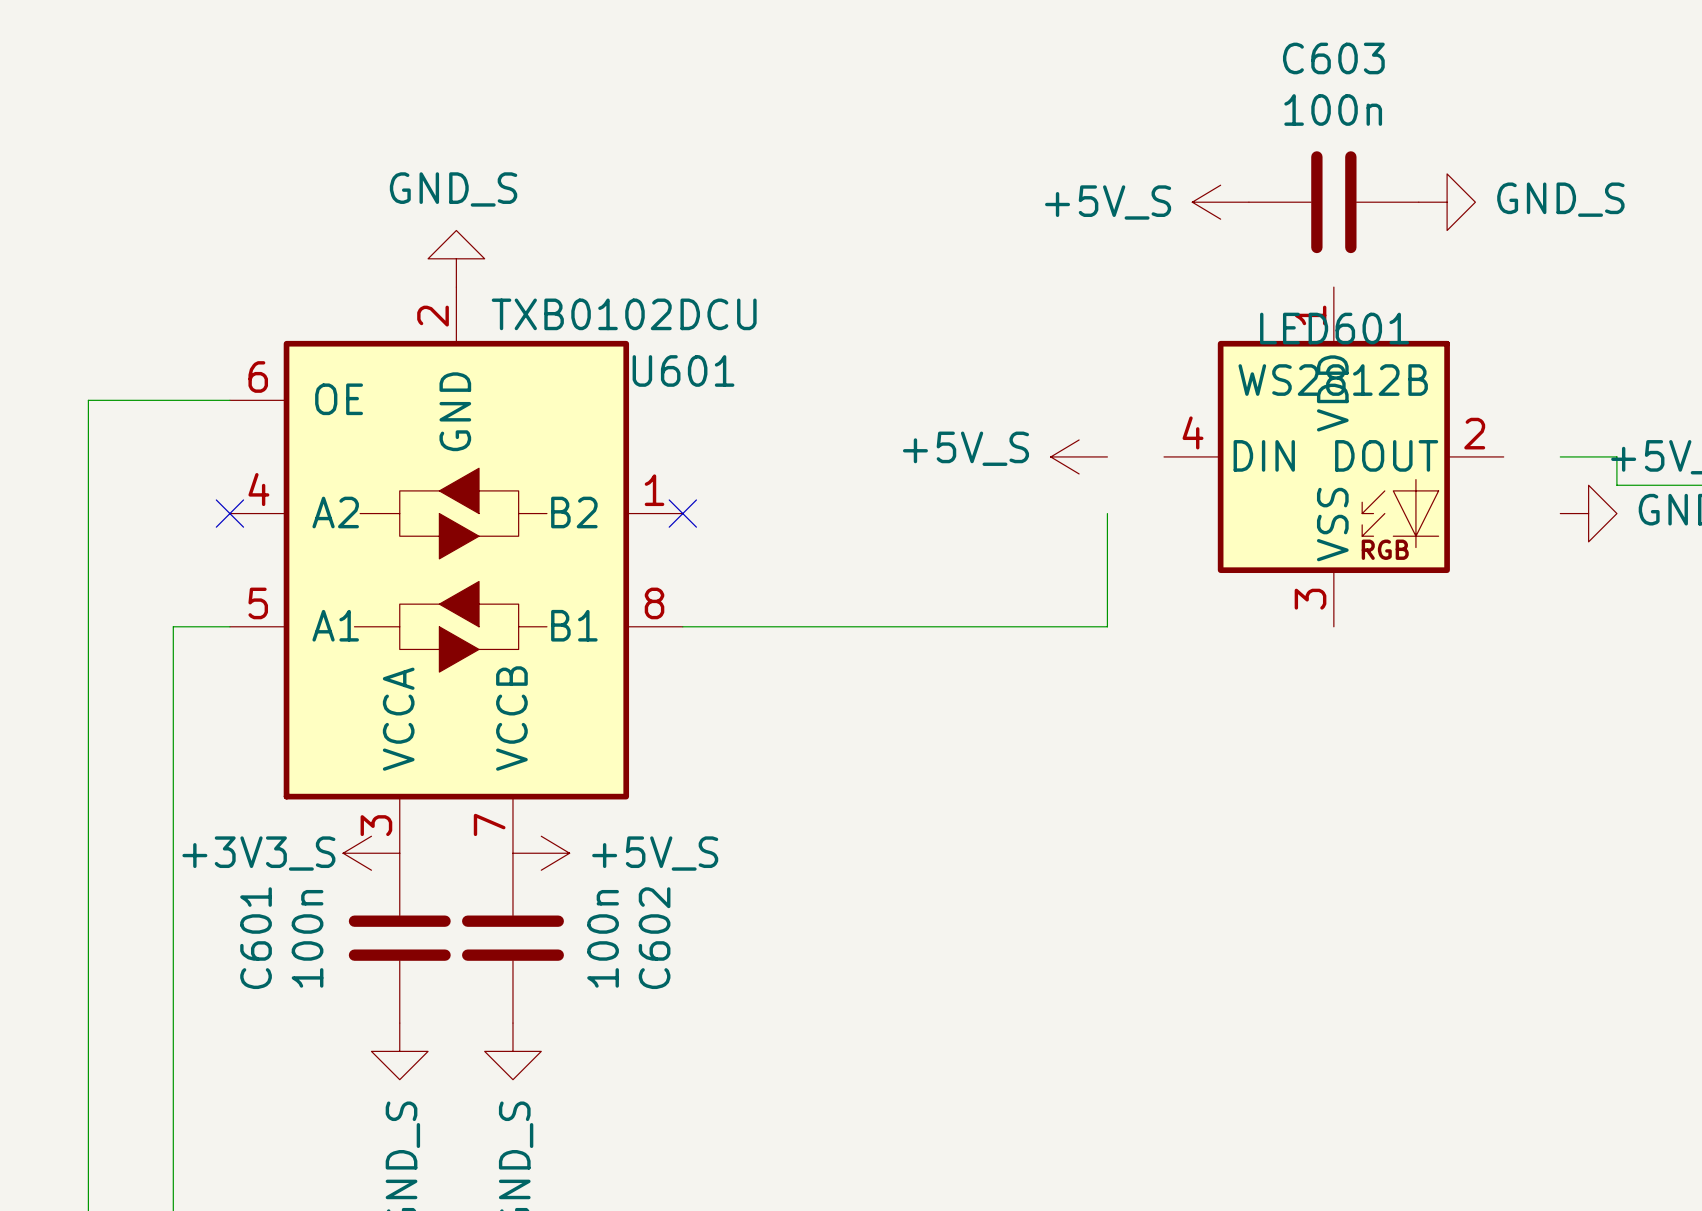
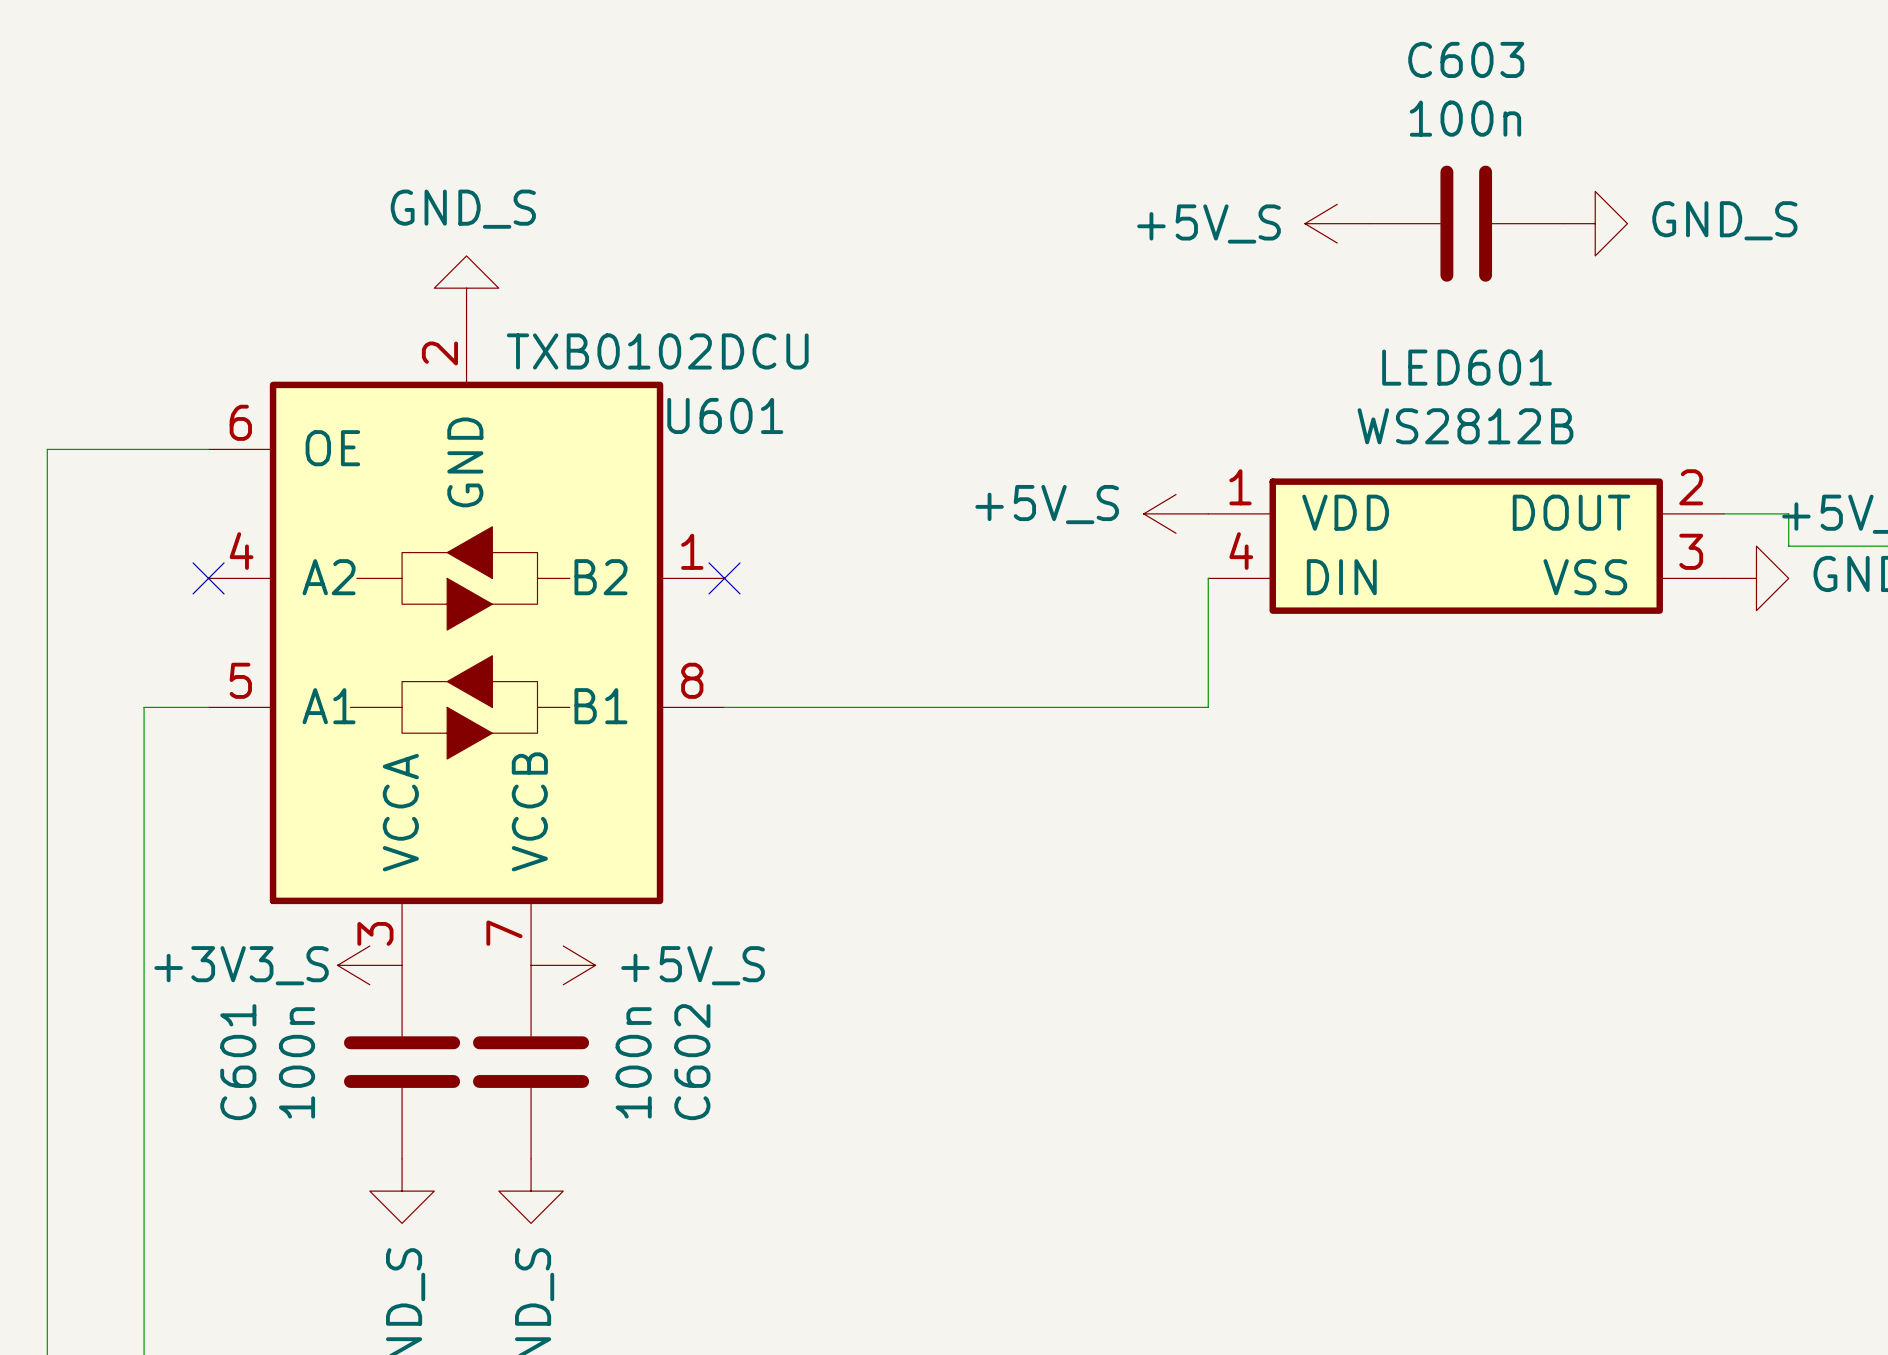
LED601 symbol: [1164, 287, 1504, 627] -> [1208, 478, 1725, 614]

